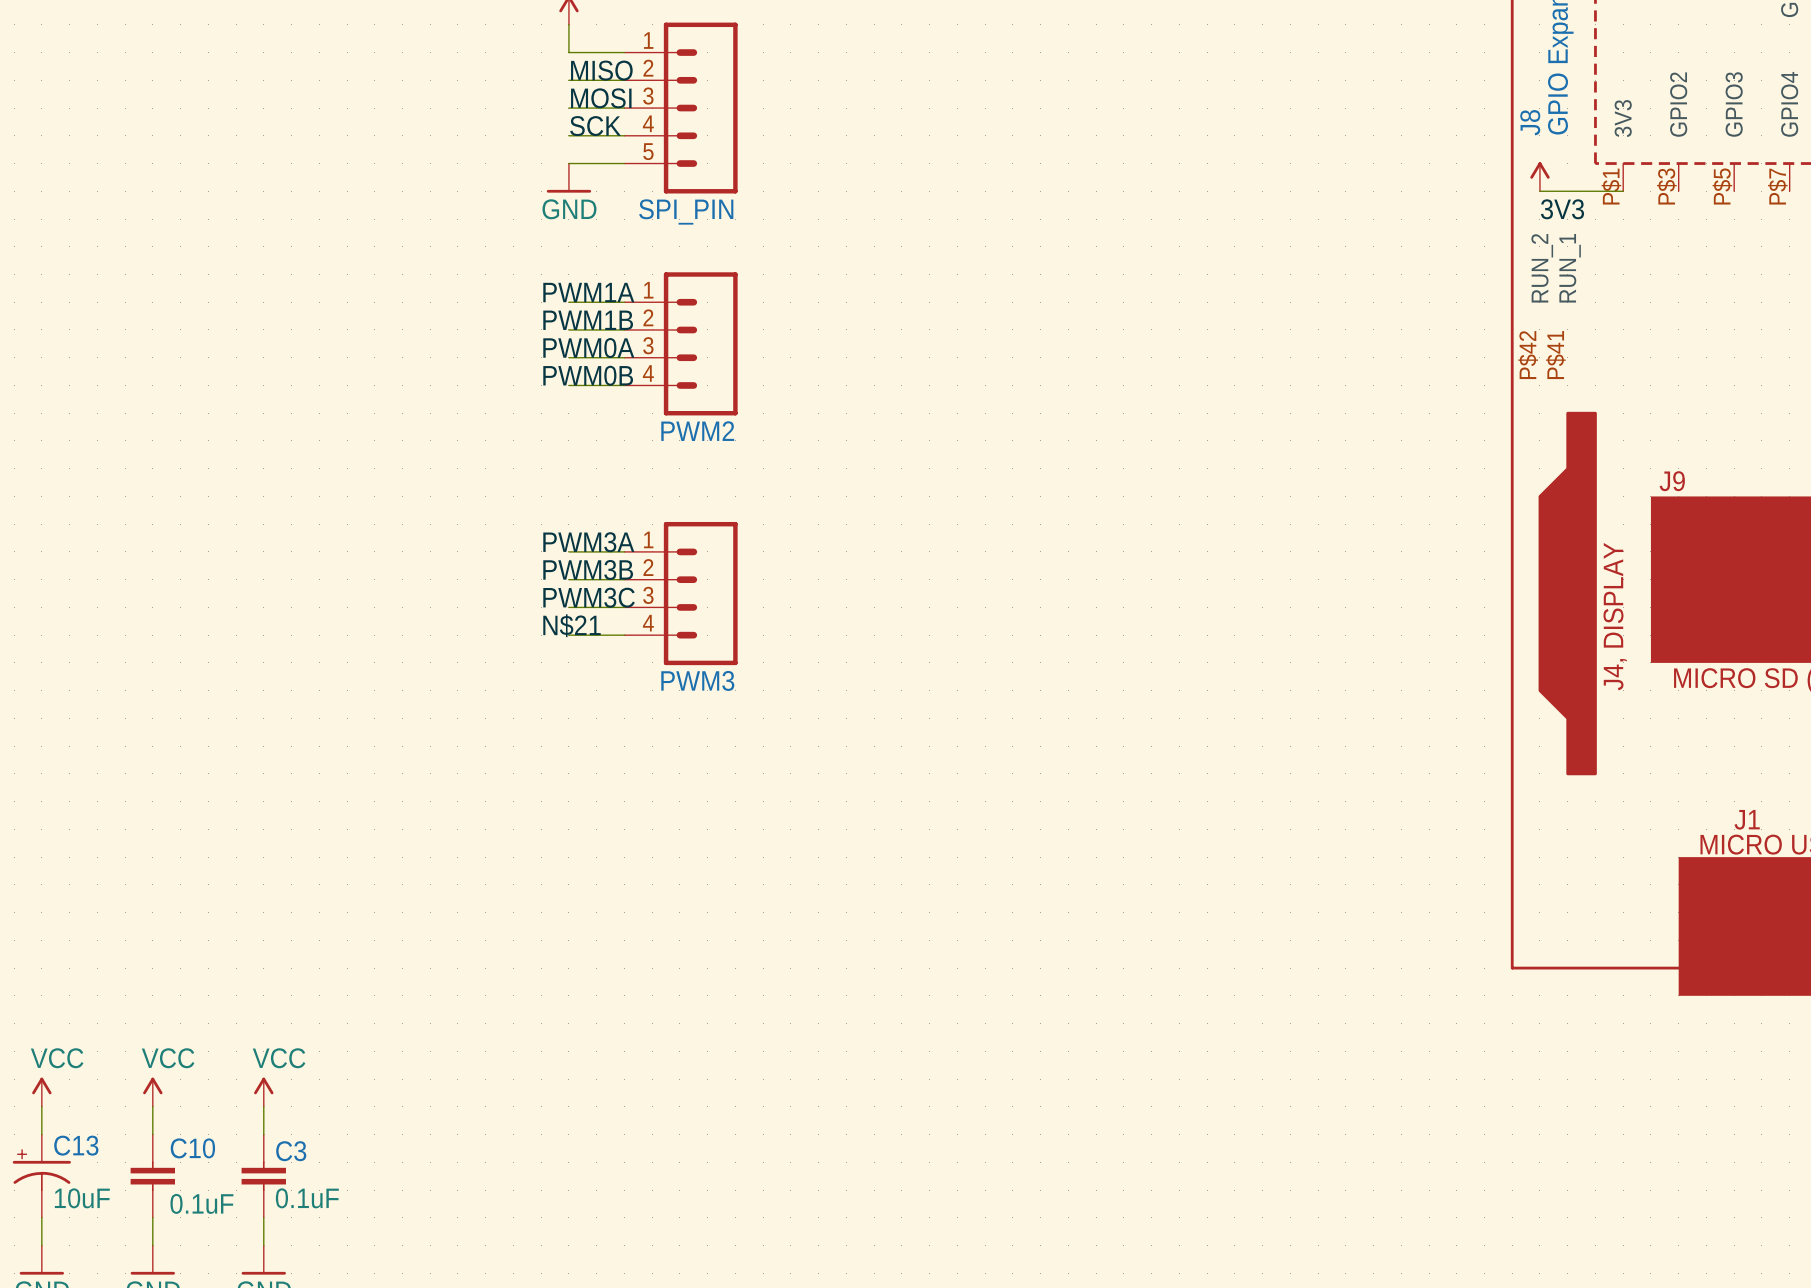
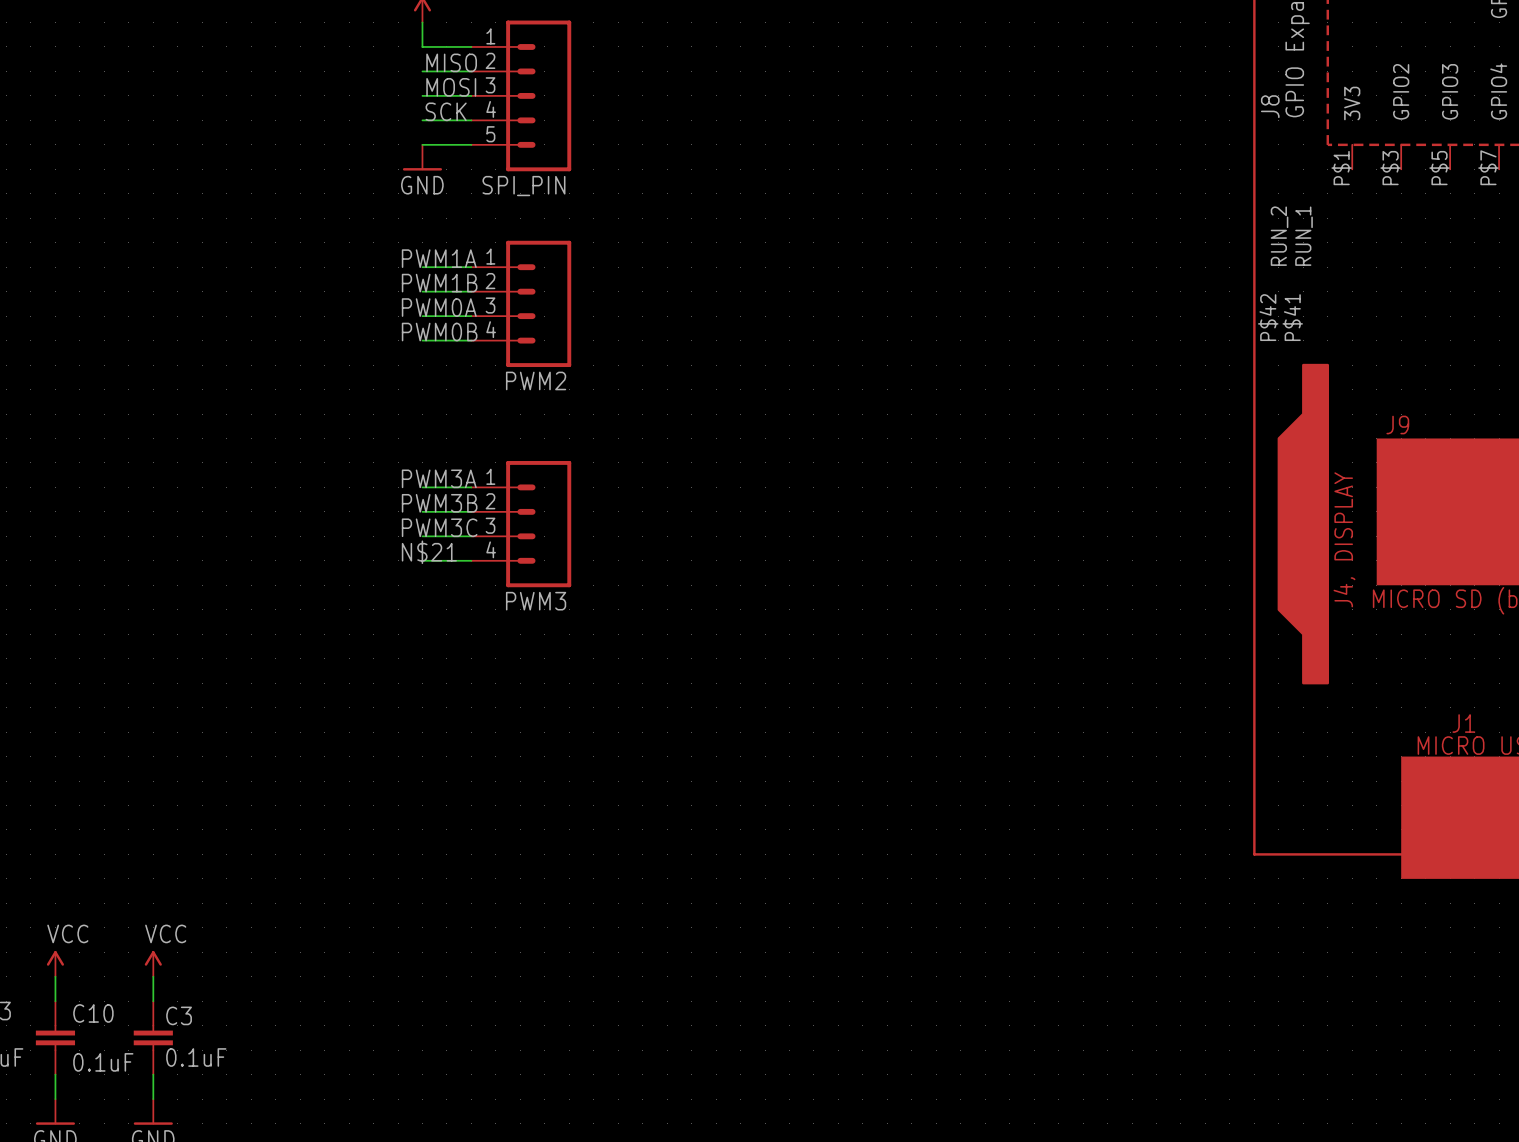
power symbol: (1539, 176) -> none
wire: (1539, 191) (1623, 191) -> none
label: 3V3 (1562, 209) -> none

